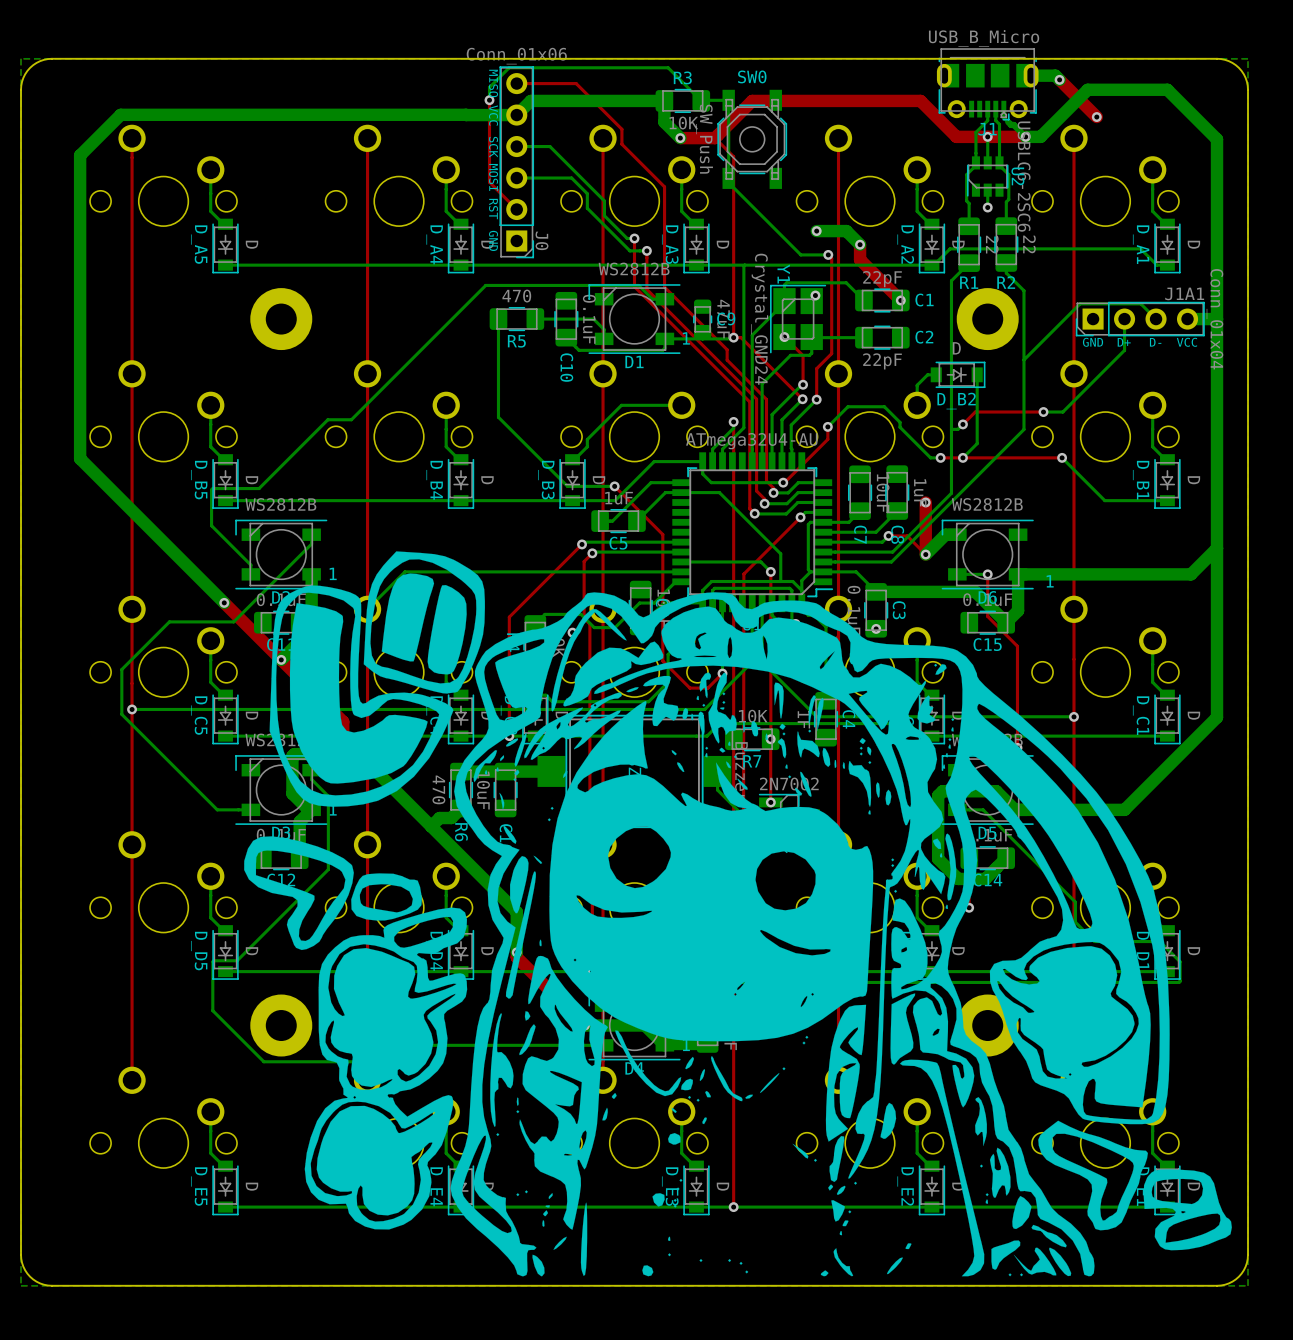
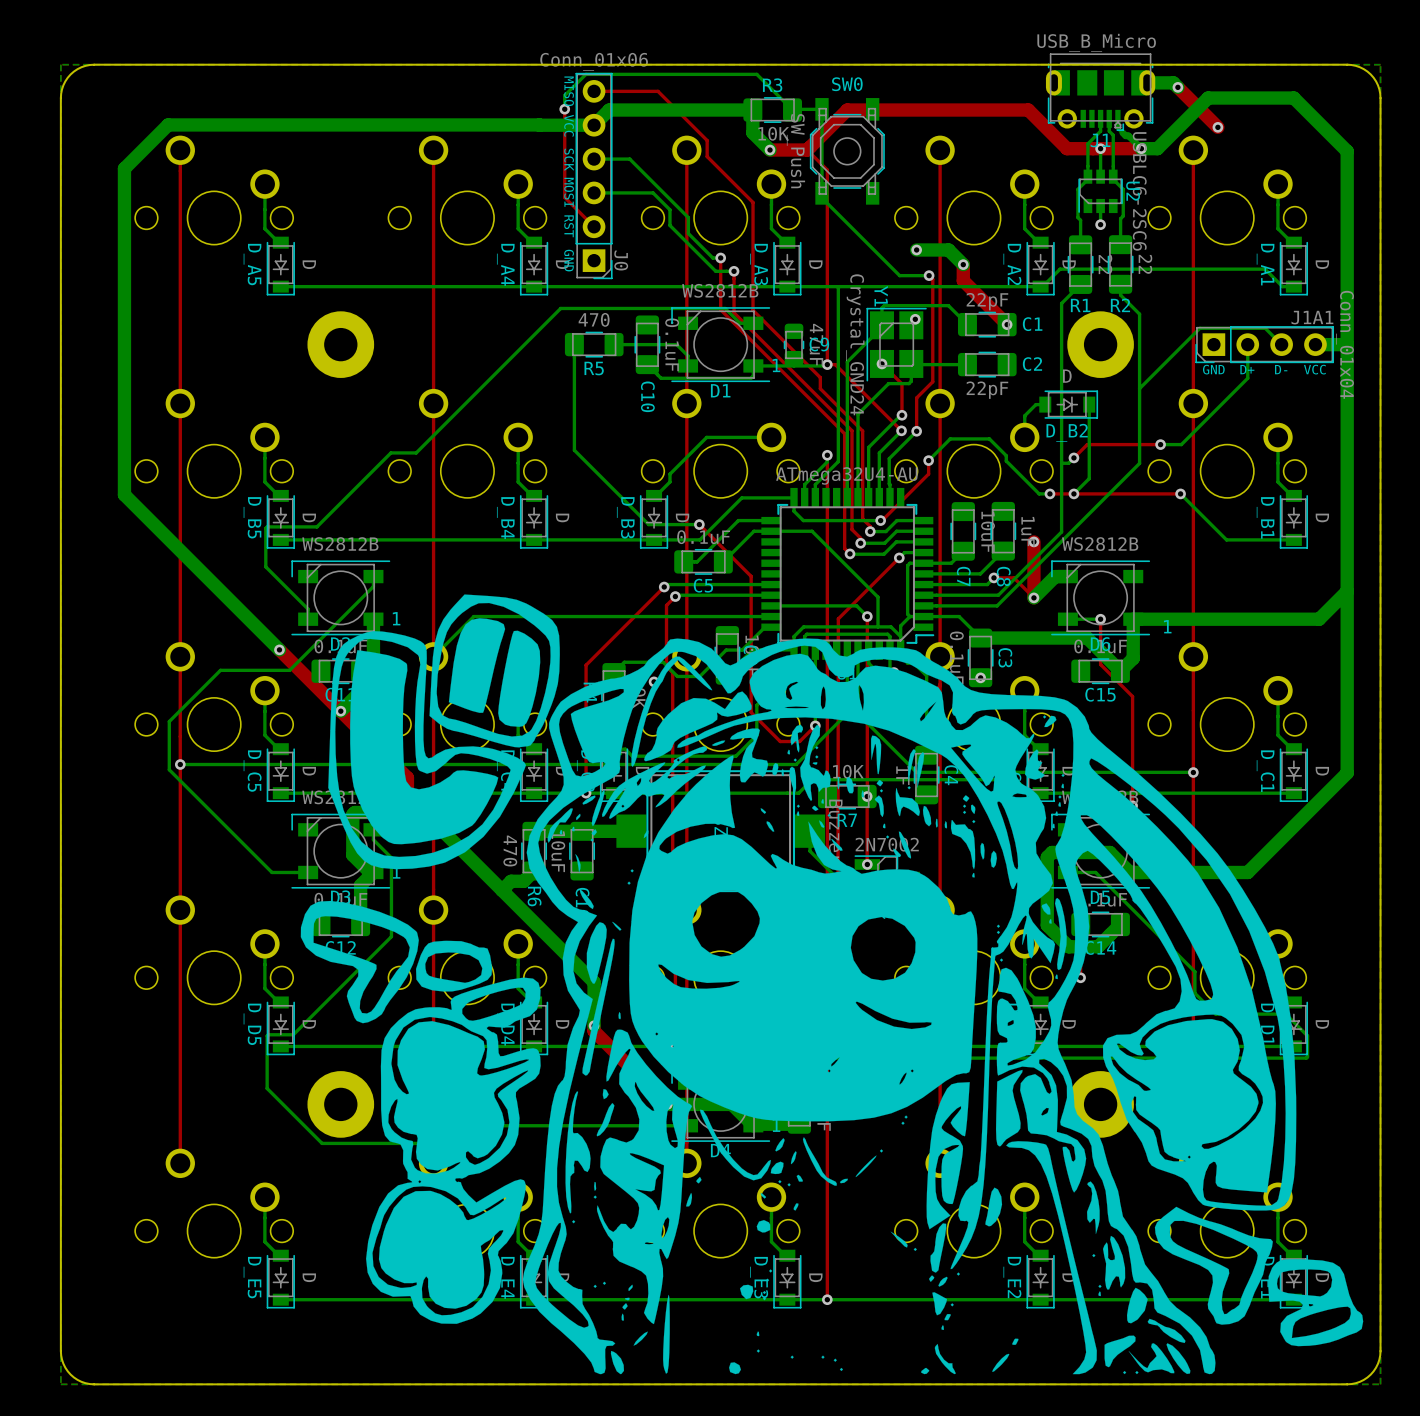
C5 value: 1uF (619, 498) -> 0.1uF (703, 537)

